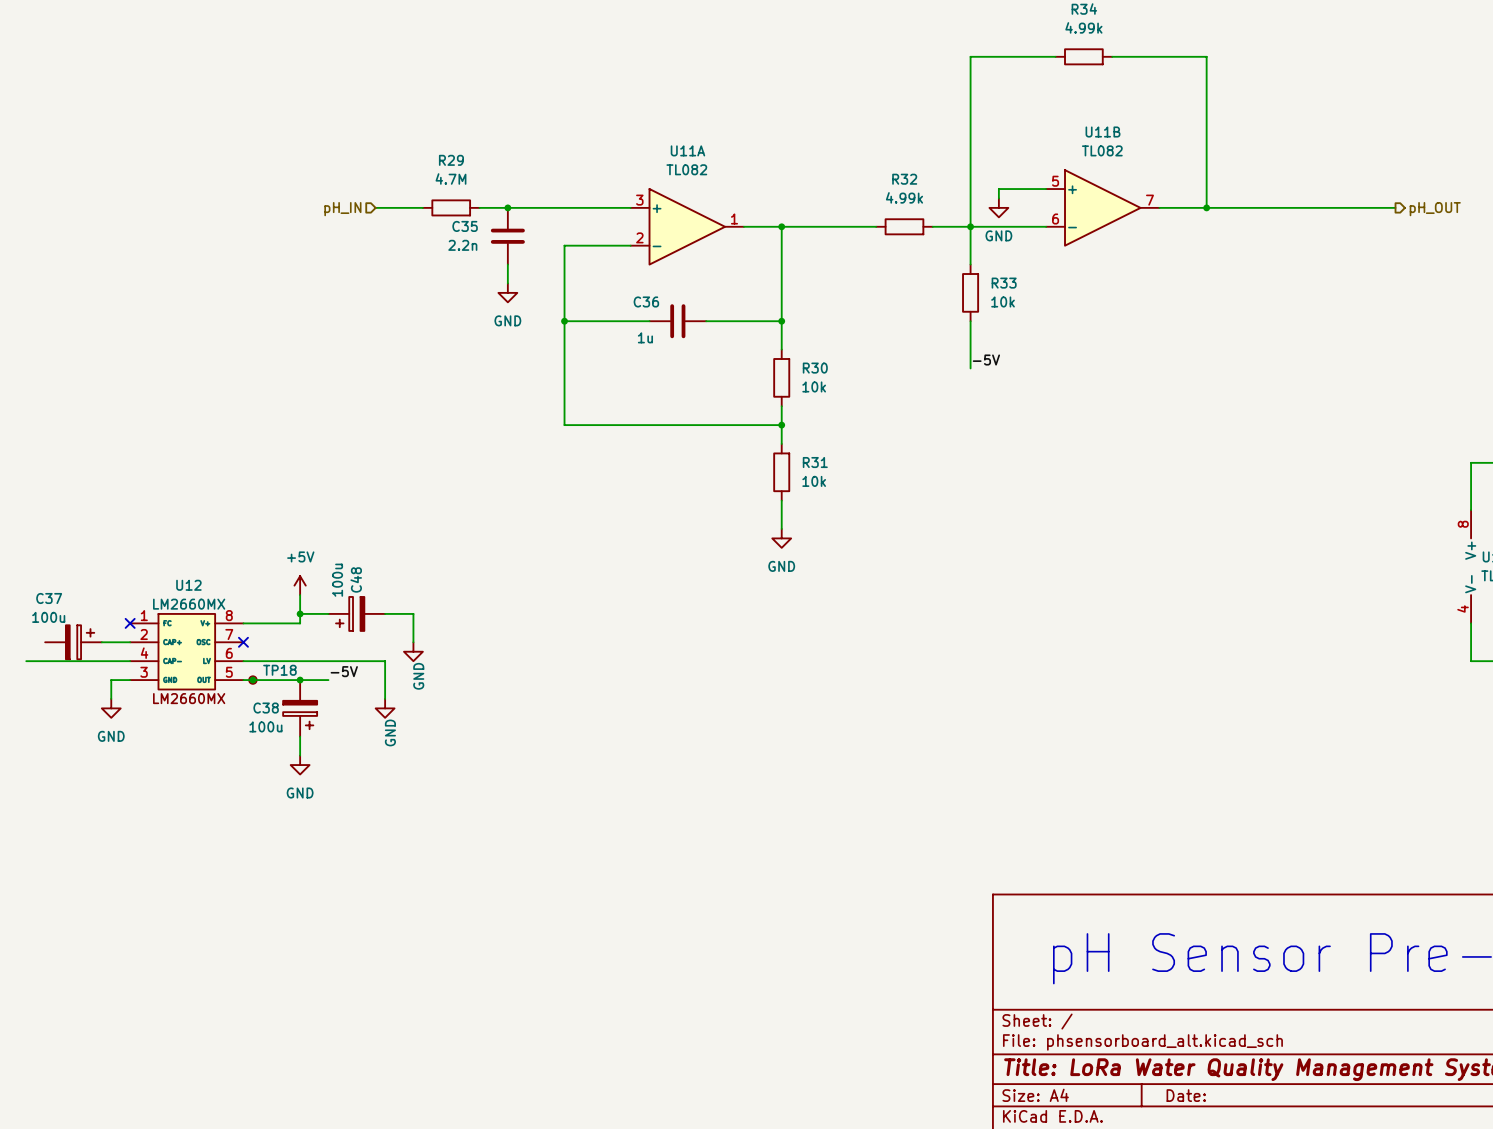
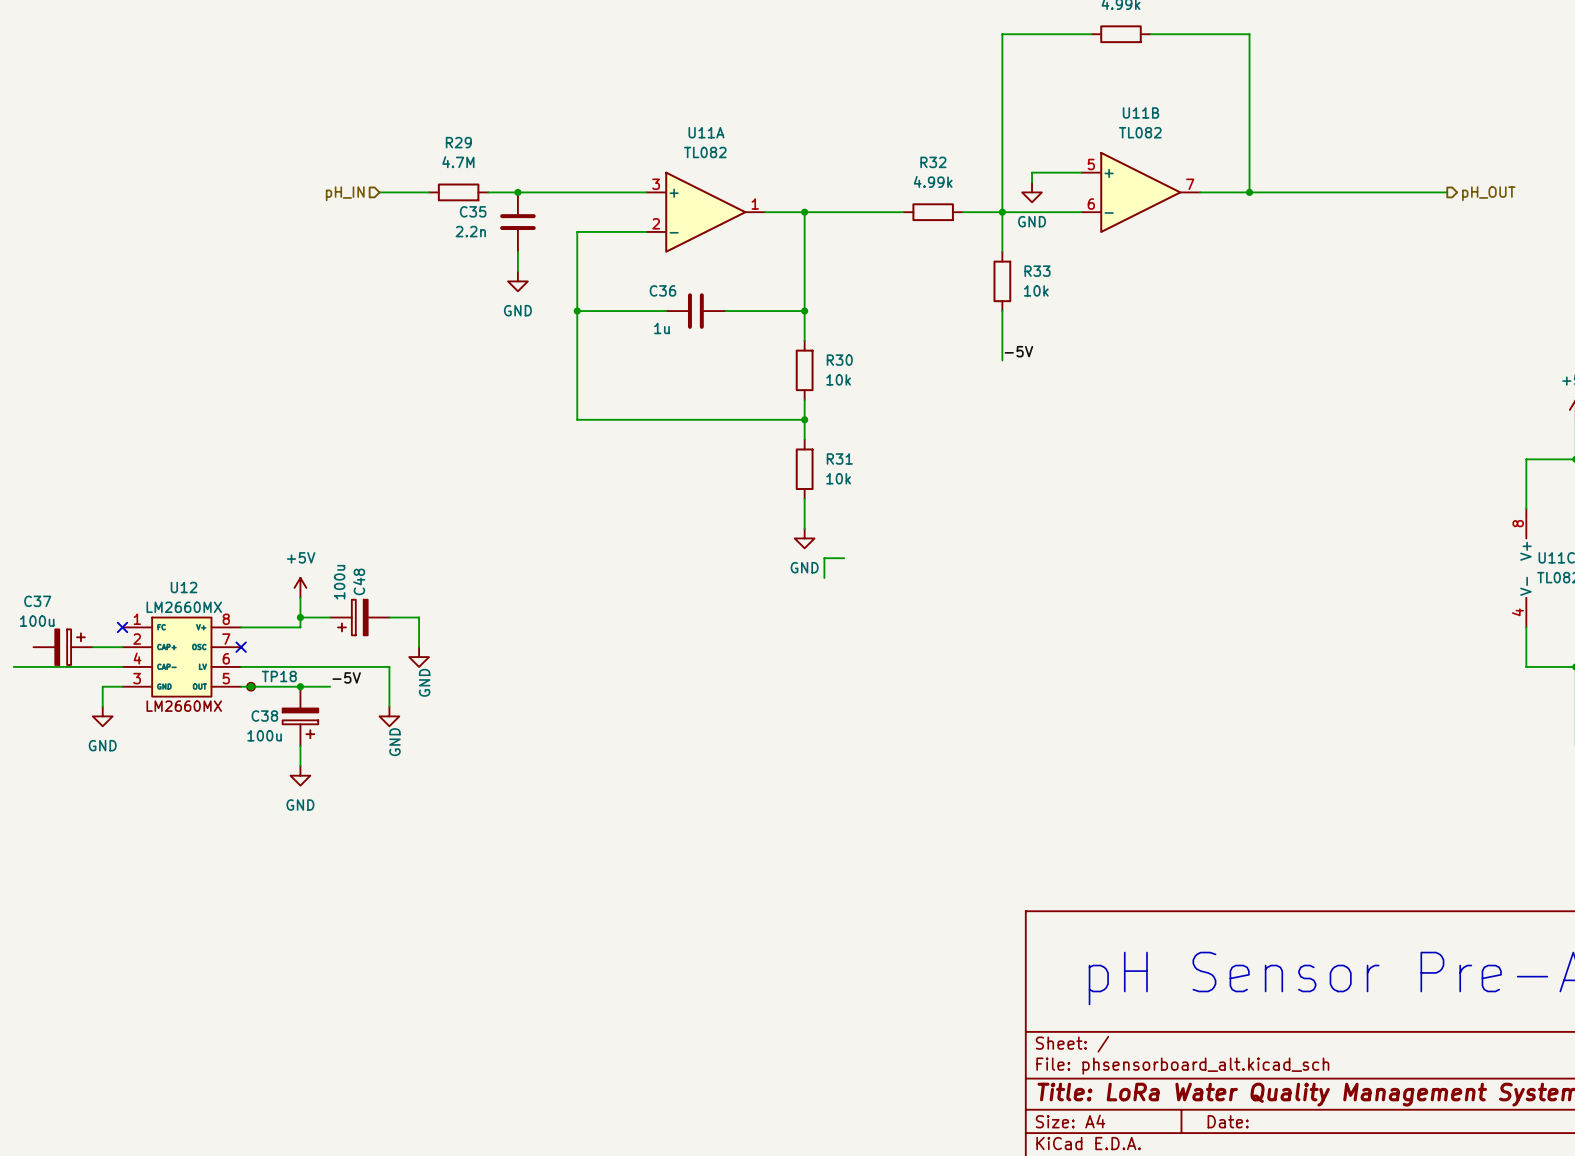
wire: none -> (844, 558) (824, 558) (824, 577)

